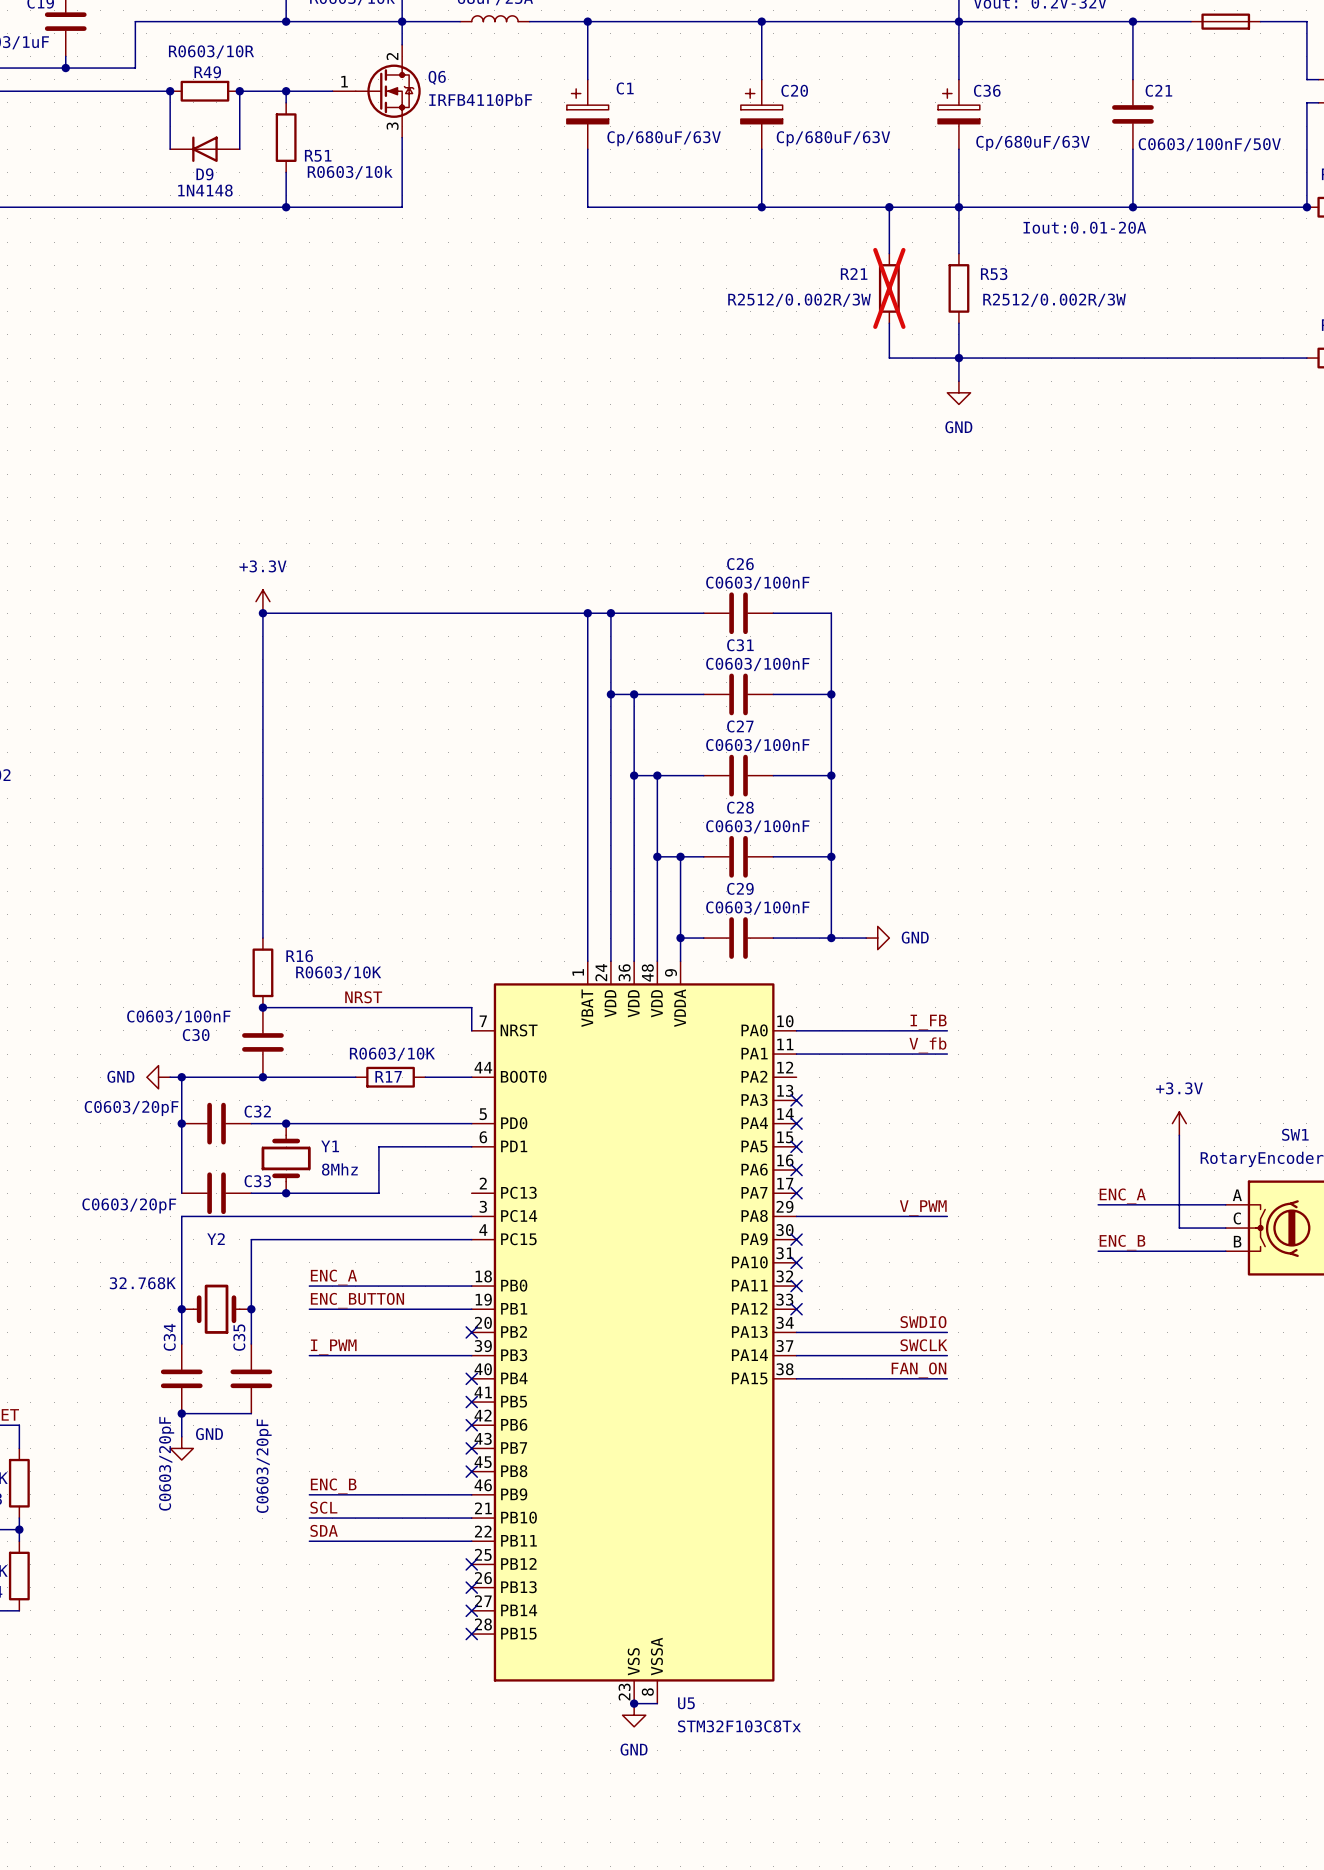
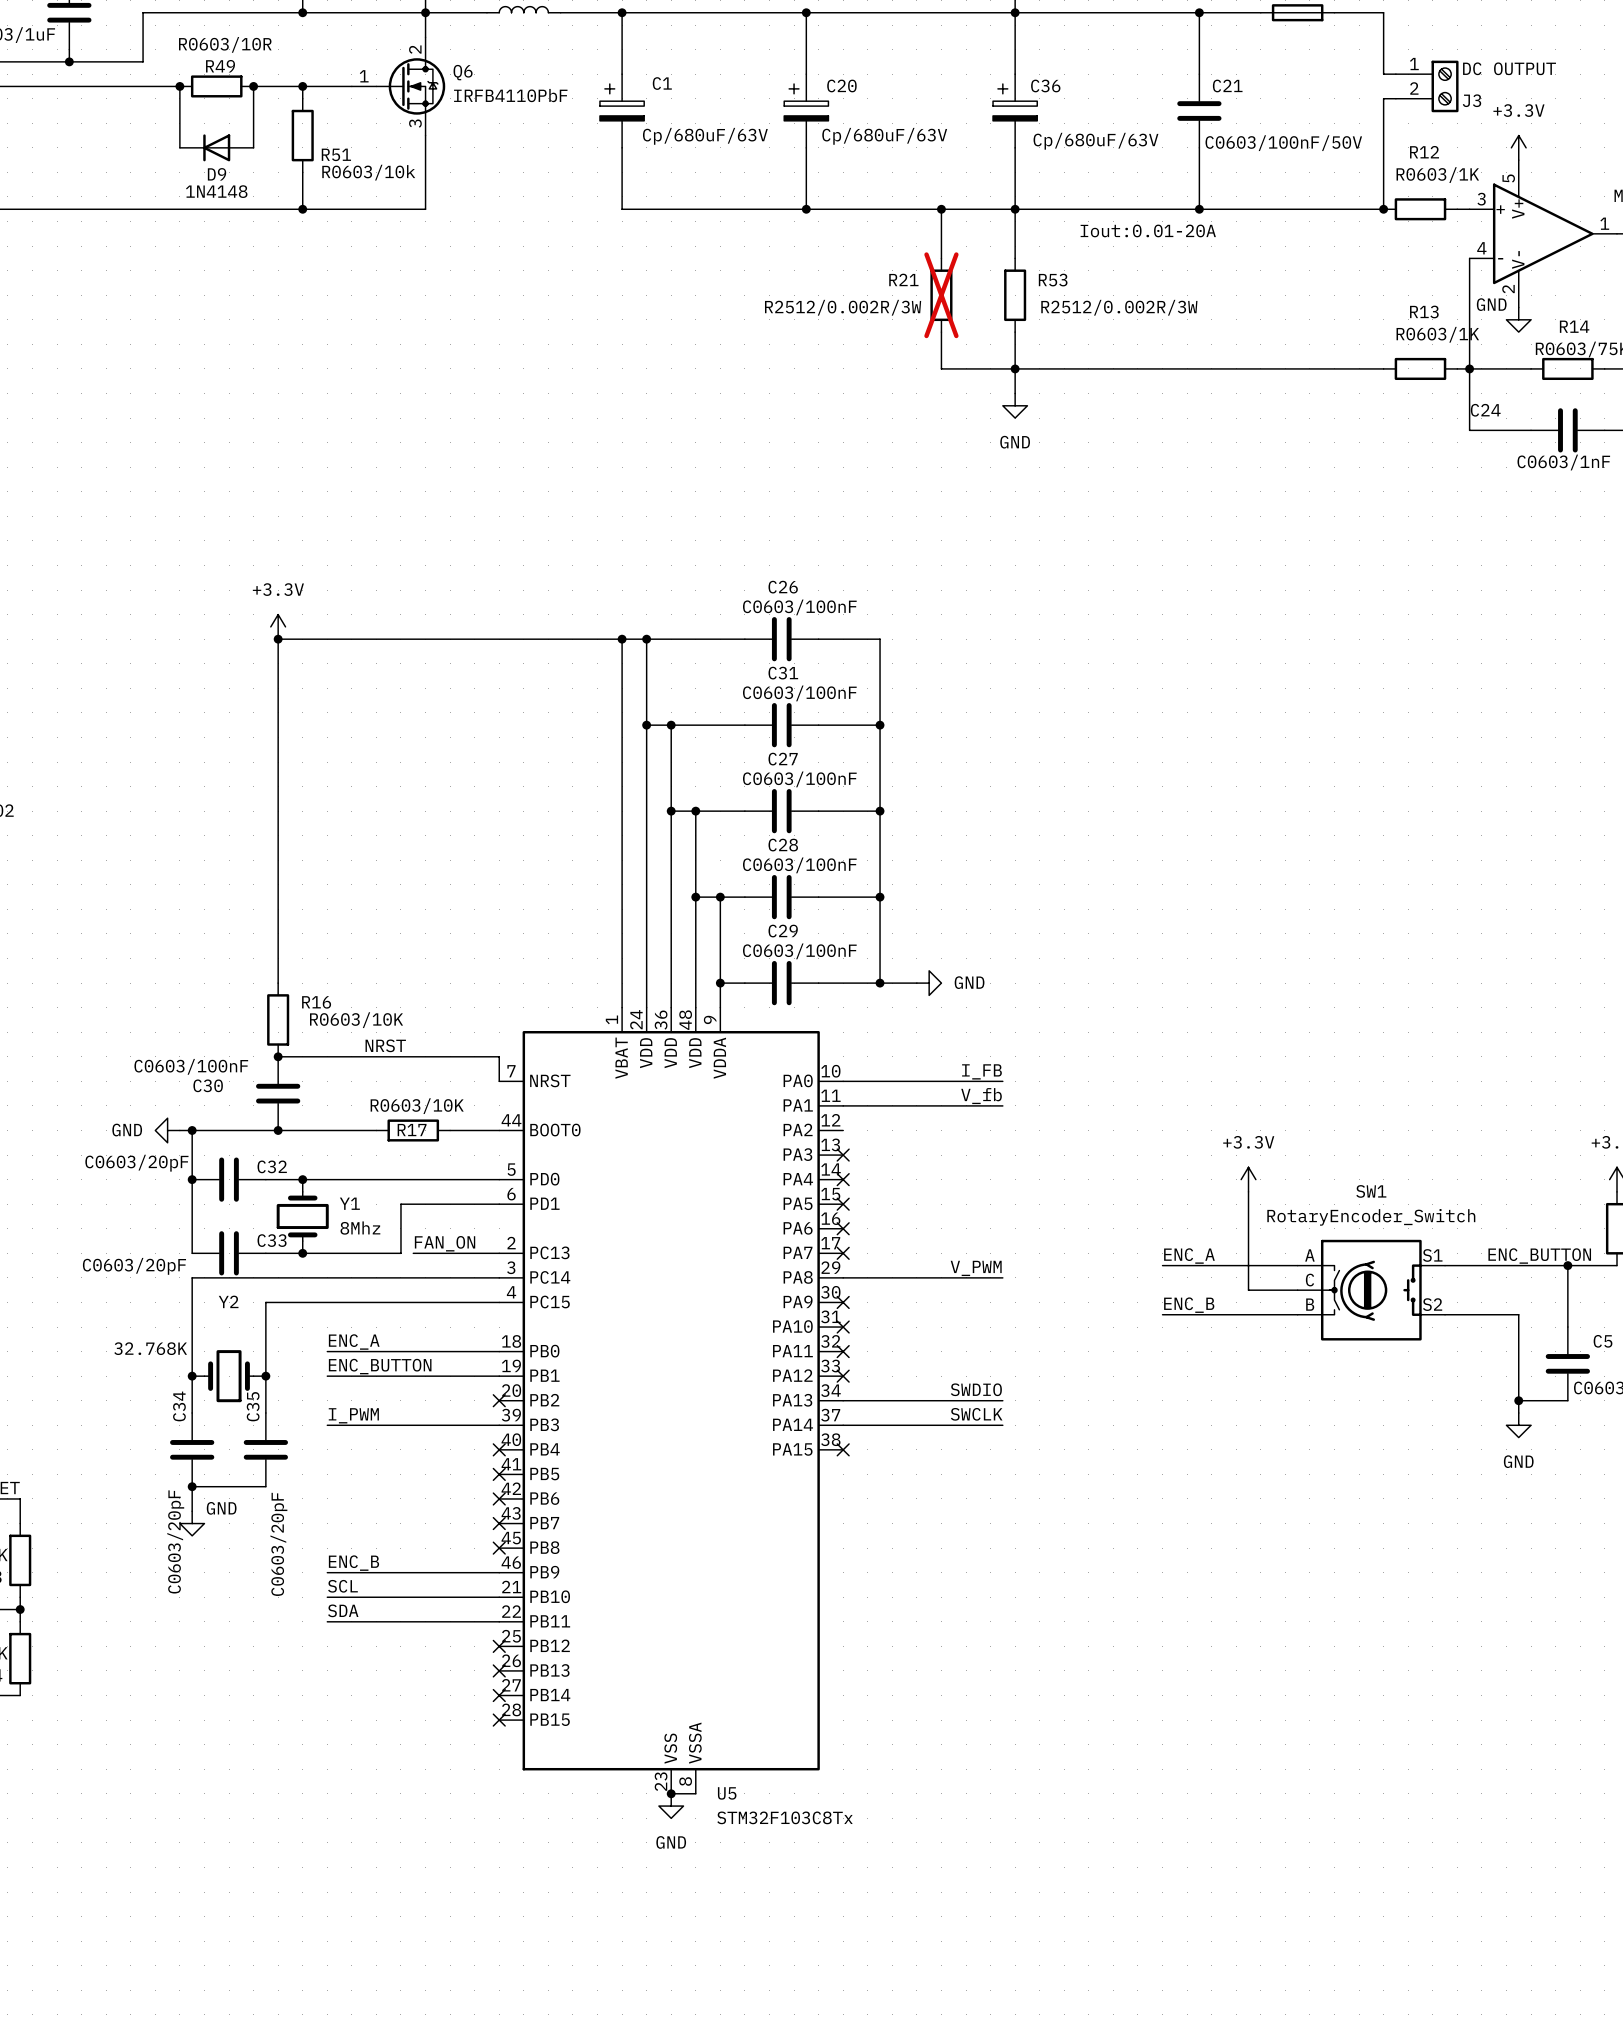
label: none -> FAN_ON (445, 1243)
wire: none -> (413, 1253) (499, 1253)
label: FAN_ON (918, 1370) -> none
wire: (796, 1378) (947, 1378) -> none
no-connect mark: none -> (843, 1449)

